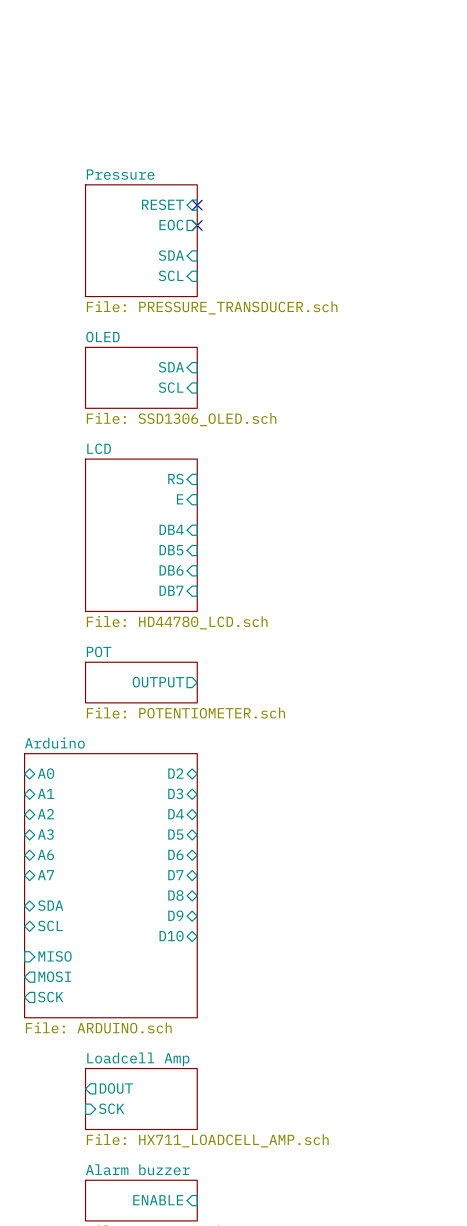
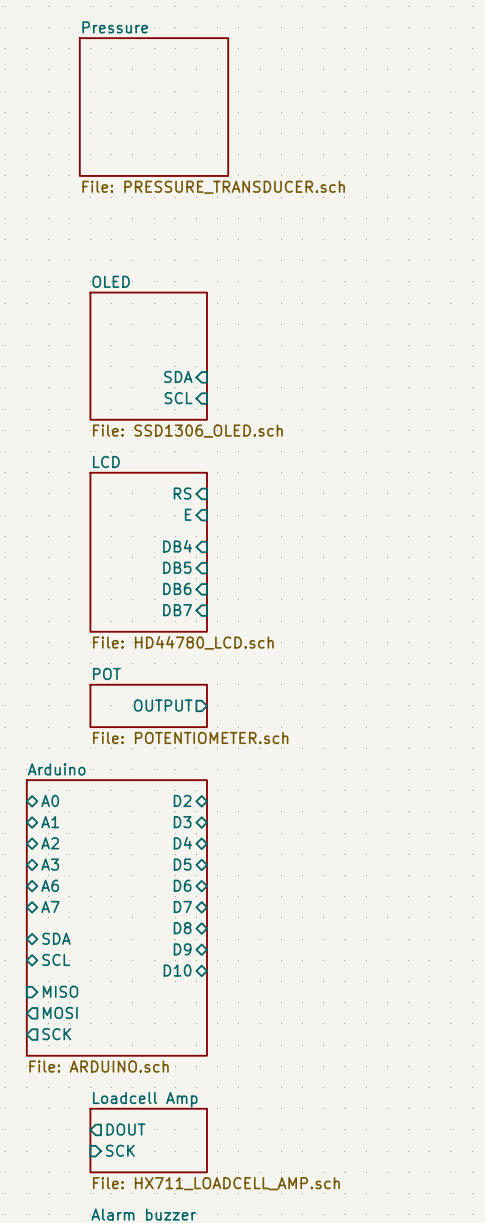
sheet Pressure: none -> File: PRESSURE_TRANSDUCER.sch (154, 107)
sheet pin: RESET (163, 204) -> none
no-connect mark: (197, 205) -> none
sheet pin: EOC (171, 225) -> none
no-connect mark: (197, 225) -> none
sheet Pressure: File: PRESSURE_TRANSDUCER.sch (141, 240) -> none
sheet pin: SDA (171, 255) -> none
sheet pin: SCL (171, 275) -> none
sheet OLED: none -> File: SSD1306_OLED.sch (148, 356)
sheet OLED: File: SSD1306_OLED.sch (141, 377) -> none

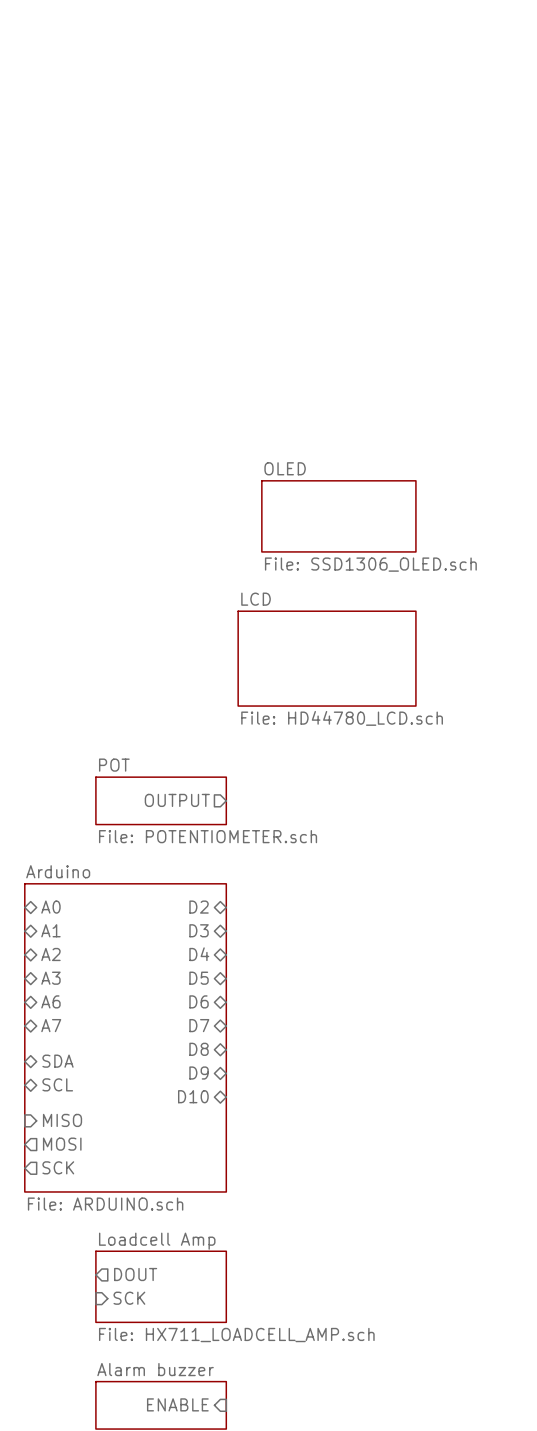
sheet Pressure: File: PRESSURE_TRANSDUCER.sch (154, 107) -> none
sheet OLED: File: SSD1306_OLED.sch (148, 356) -> none
sheet pin: SDA (178, 376) -> none
sheet pin: SCL (178, 398) -> none
sheet OLED: none -> File: SSD1306_OLED.sch (338, 516)
sheet pin: RS (182, 493) -> none
sheet pin: E (188, 514) -> none
sheet pin: DB4 (177, 546) -> none
sheet LCD: File: HD44780_LCD.sch (148, 552) -> none
sheet pin: DB5 (177, 567) -> none
sheet LCD: none -> File: HD44780_LCD.sch (327, 658)
sheet pin: DB6 (177, 588) -> none
sheet pin: DB7 (177, 610) -> none

